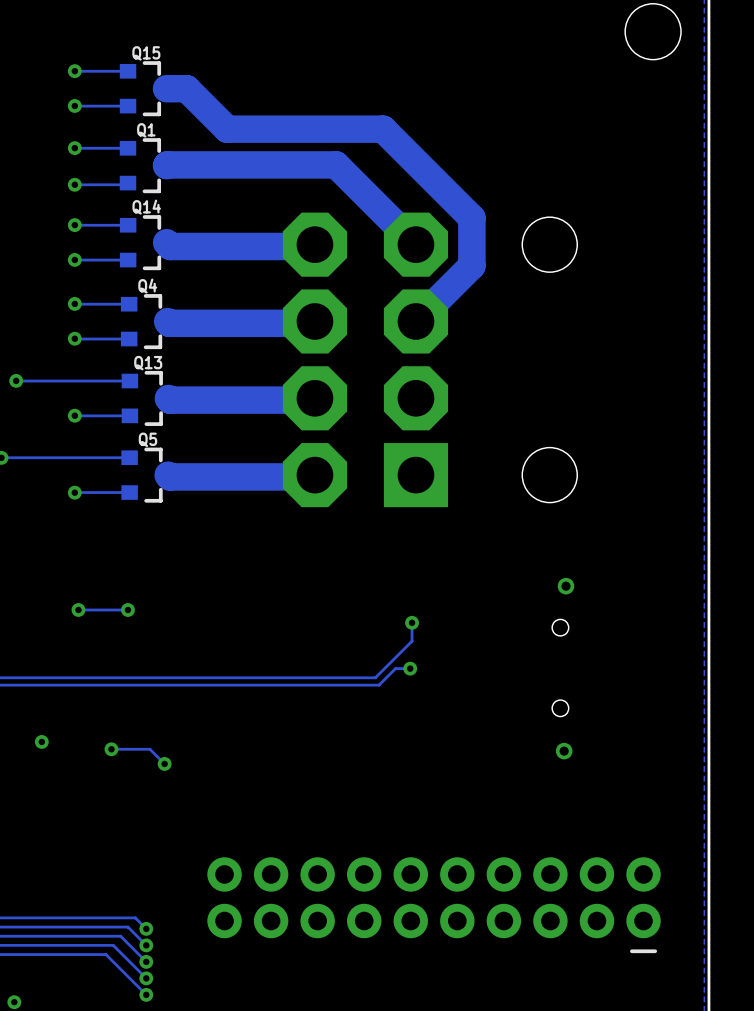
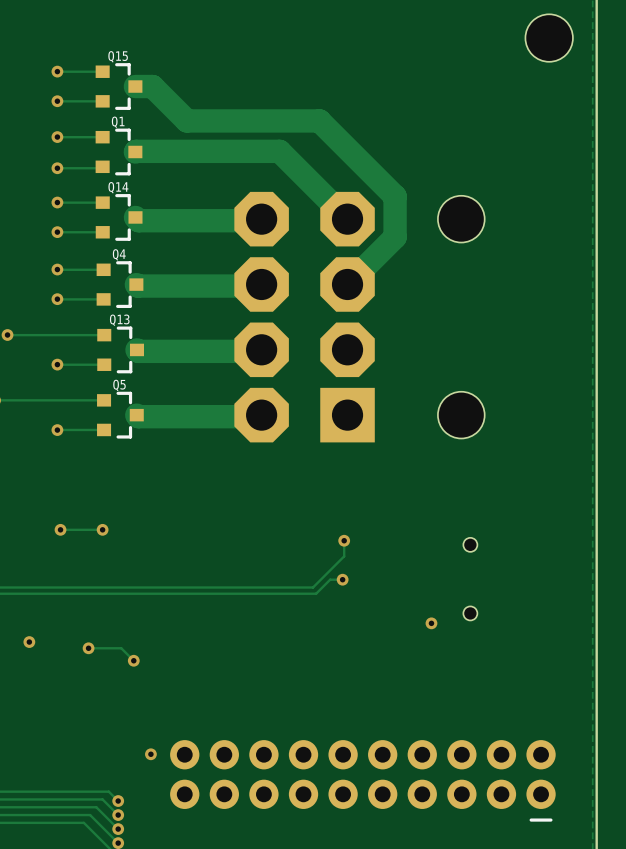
via: (566, 586) -> none
via: none -> (431, 623)
via: (564, 751) -> none
via: none -> (150, 754)

